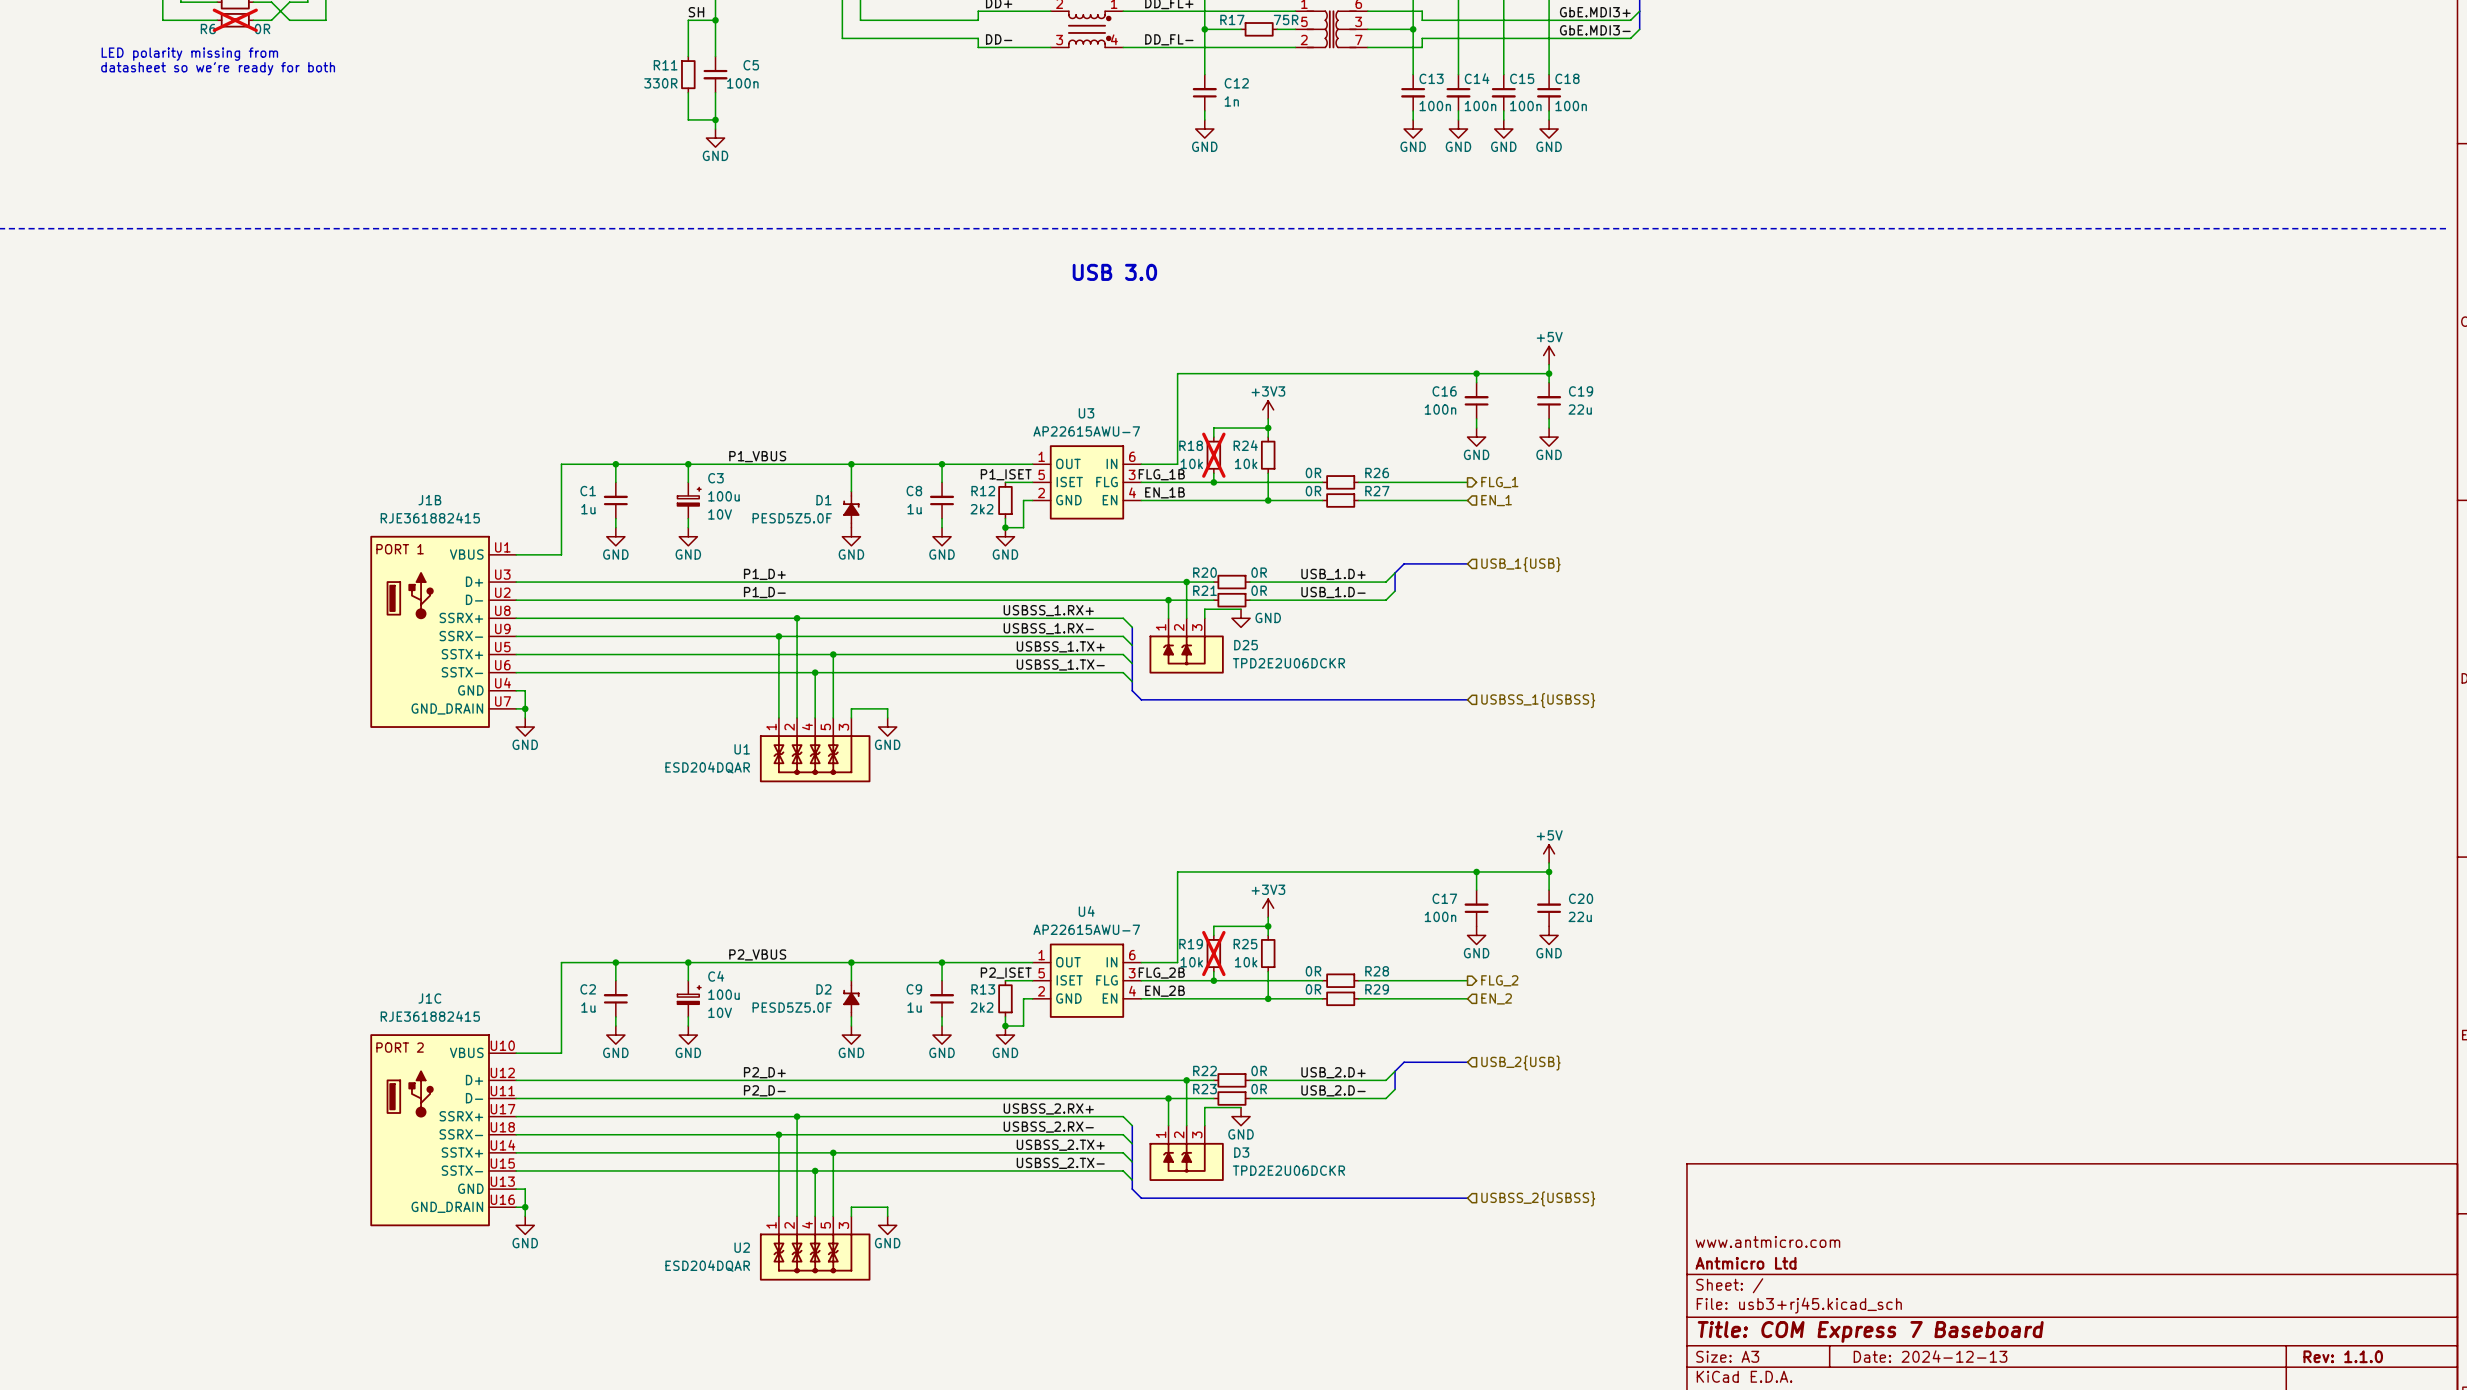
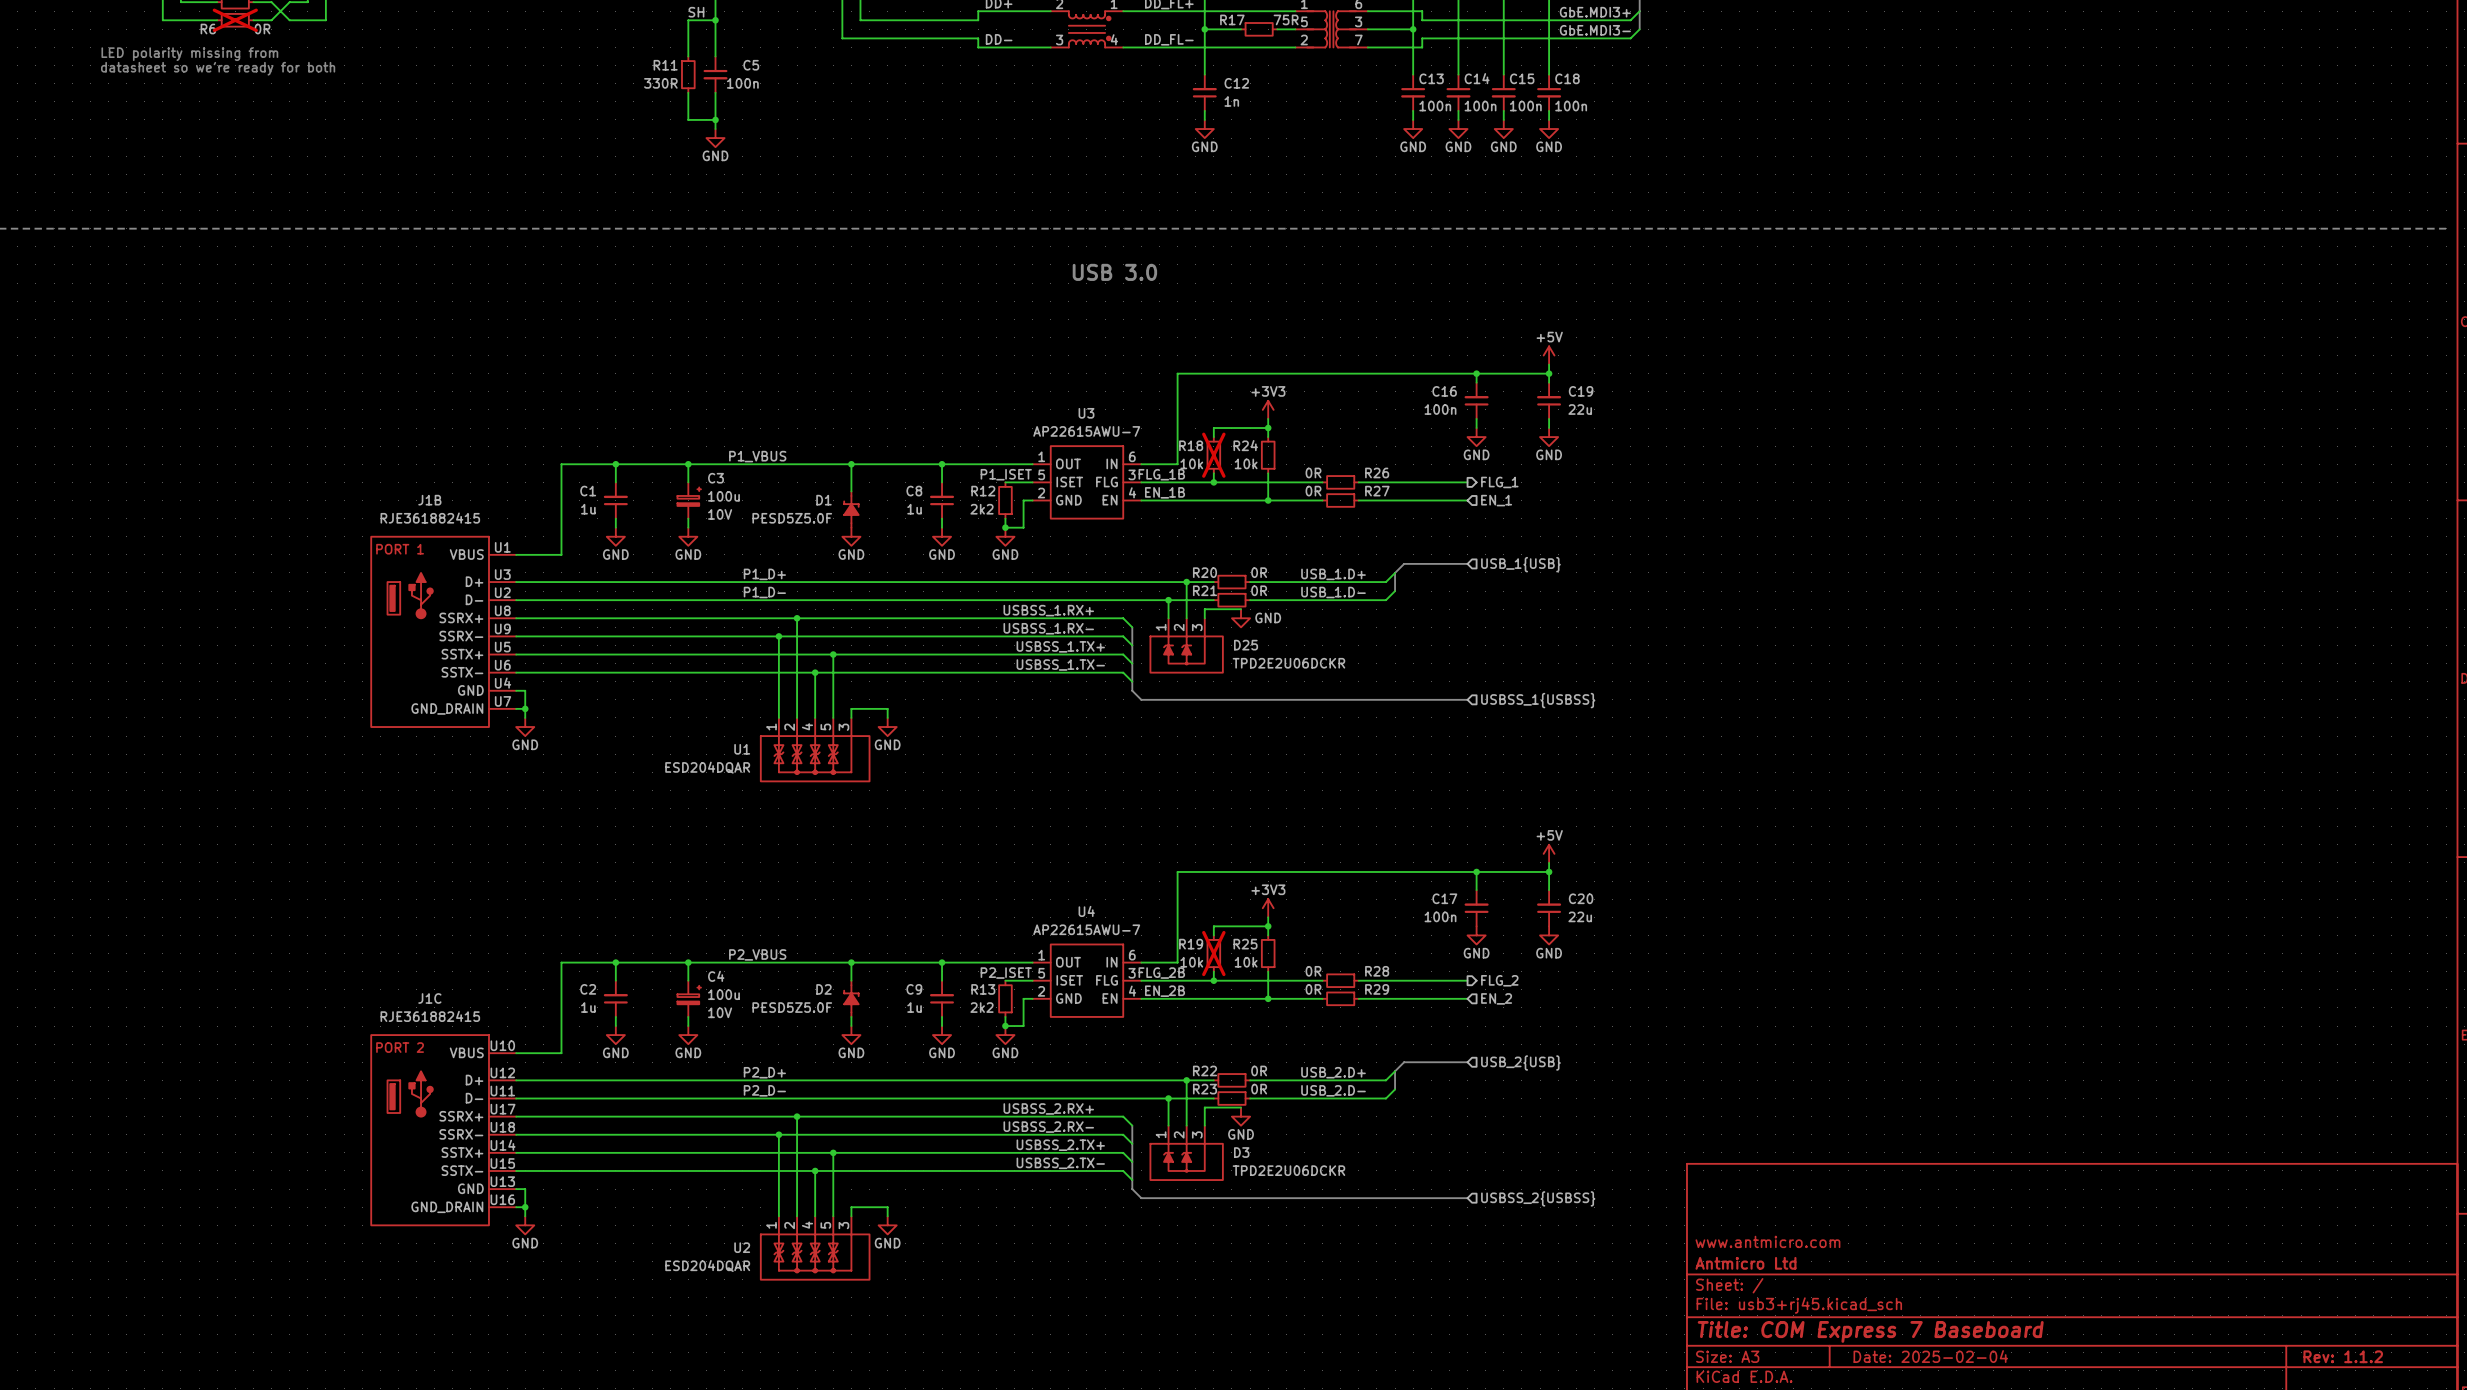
title block: Date: 2024-12-13 (1930, 1356) -> Date: 2025-02-04 (1930, 1356)
title block: Rev: 1.1.0 (2343, 1356) -> Rev: 1.1.2 (2343, 1356)

